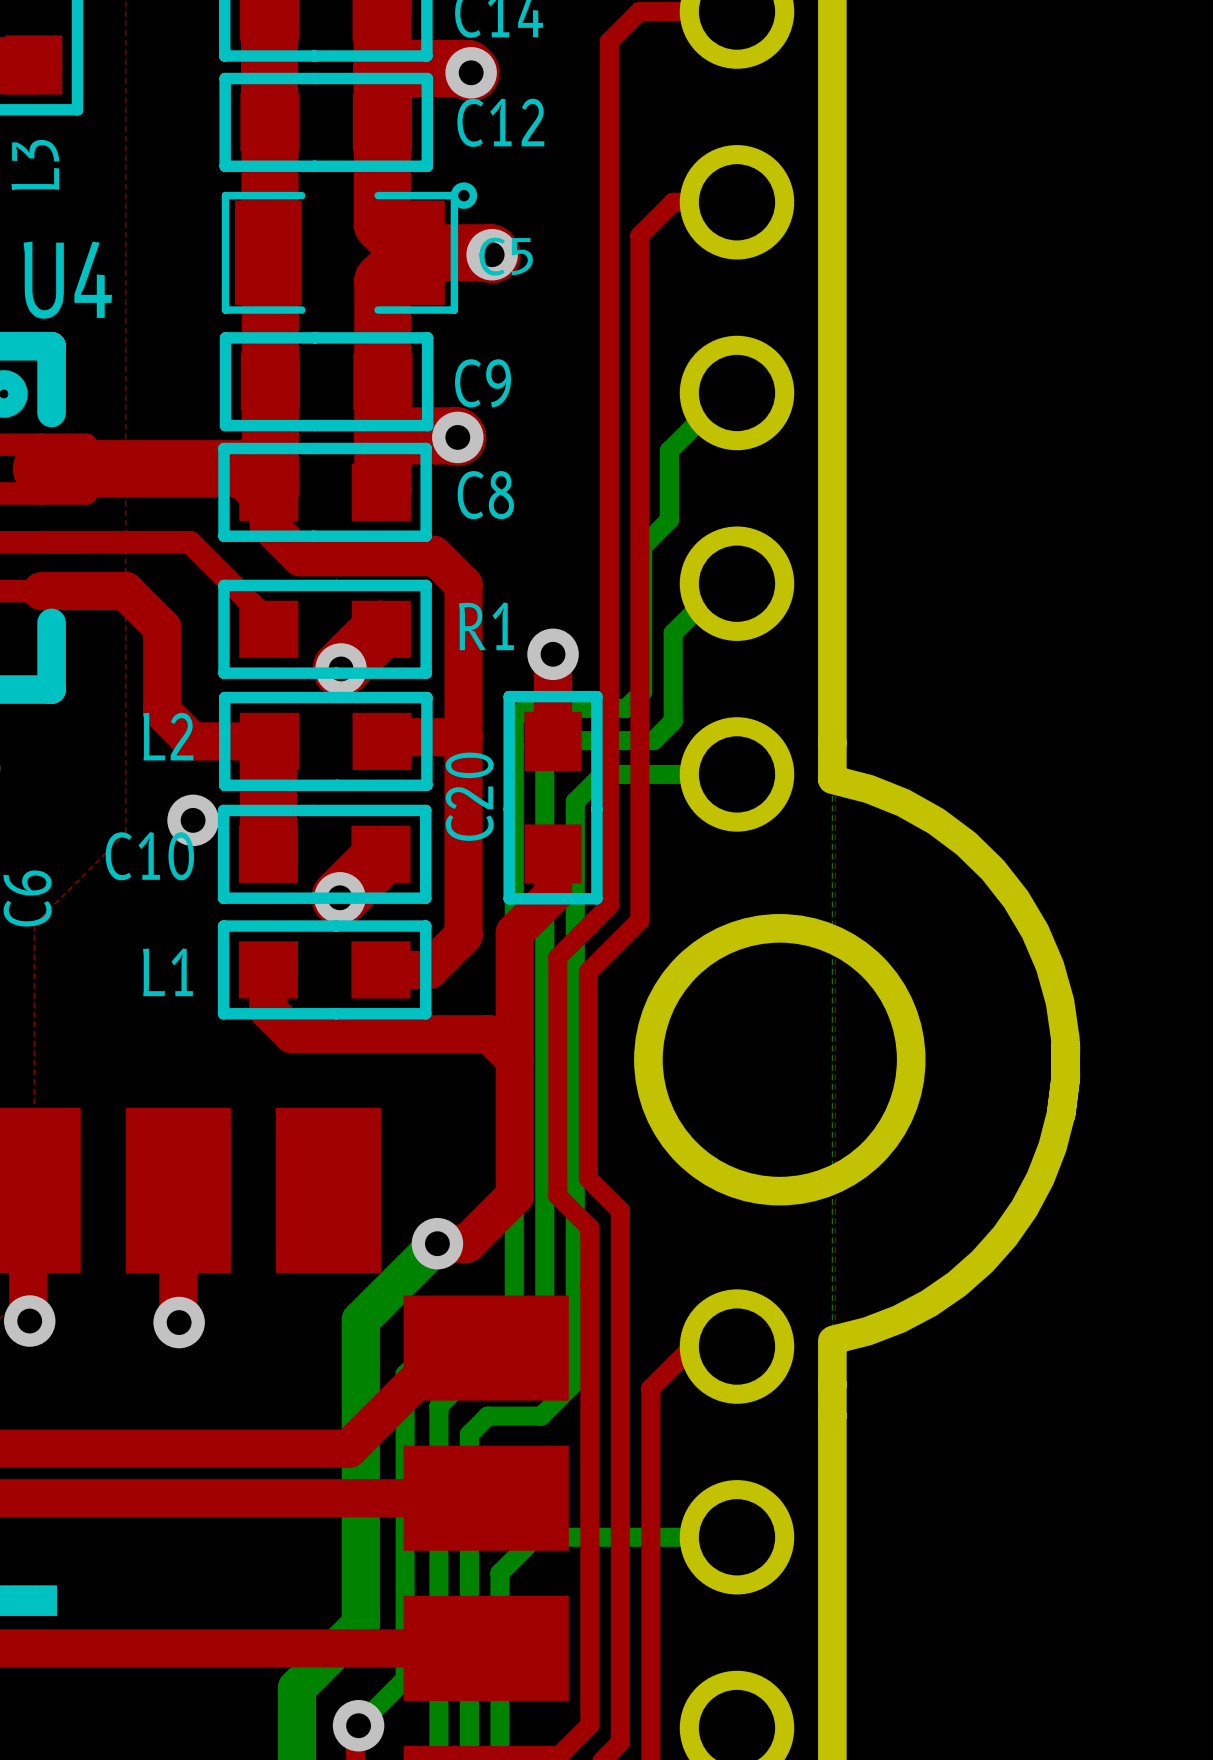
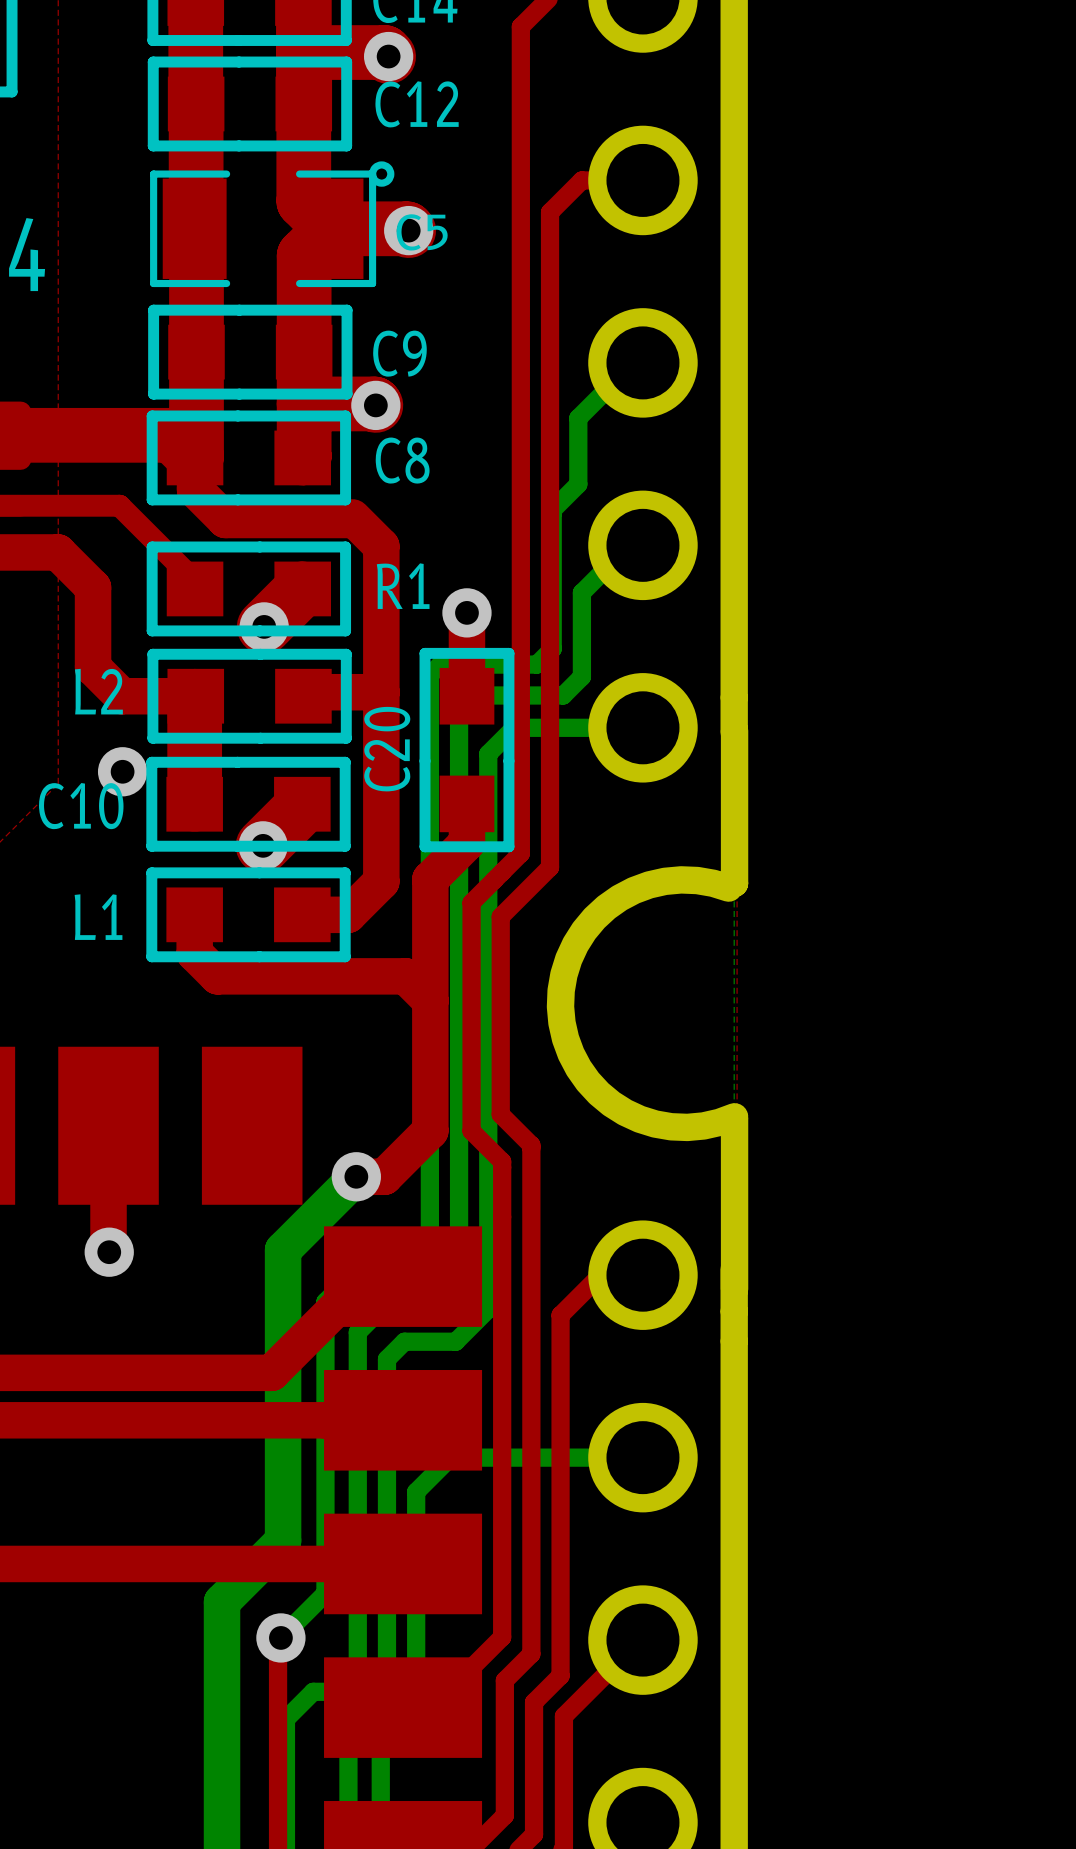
board edge: (832, 779) (868, 788) (903, 802) (936, 821) (966, 843) (992, 869) (1016, 899) (1035, 931) (1049, 965) (1060, 1002) (1065, 1039) (1065, 1076) (1061, 1113) -> (734, 730) (734, 883) (732, 883)
round board edge: [634, 914, 926, 1206] -> none
board edge: none -> (728, 888) (697, 880) (664, 881) (633, 890) (606, 907) (584, 930) (575, 944) (563, 974) (560, 1006) (565, 1038) (578, 1068) (598, 1093) (625, 1112) (655, 1124) (687, 1127) (719, 1122) (734, 1116)
board edge: (1065, 1046) (1065, 1080) (1061, 1113) (1052, 1146) (1040, 1178) (1024, 1208) (1004, 1236) (982, 1261) (956, 1284) (928, 1303) (898, 1319) (867, 1331) (834, 1339) -> none
board edge: none -> (734, 1118) (734, 1289)

